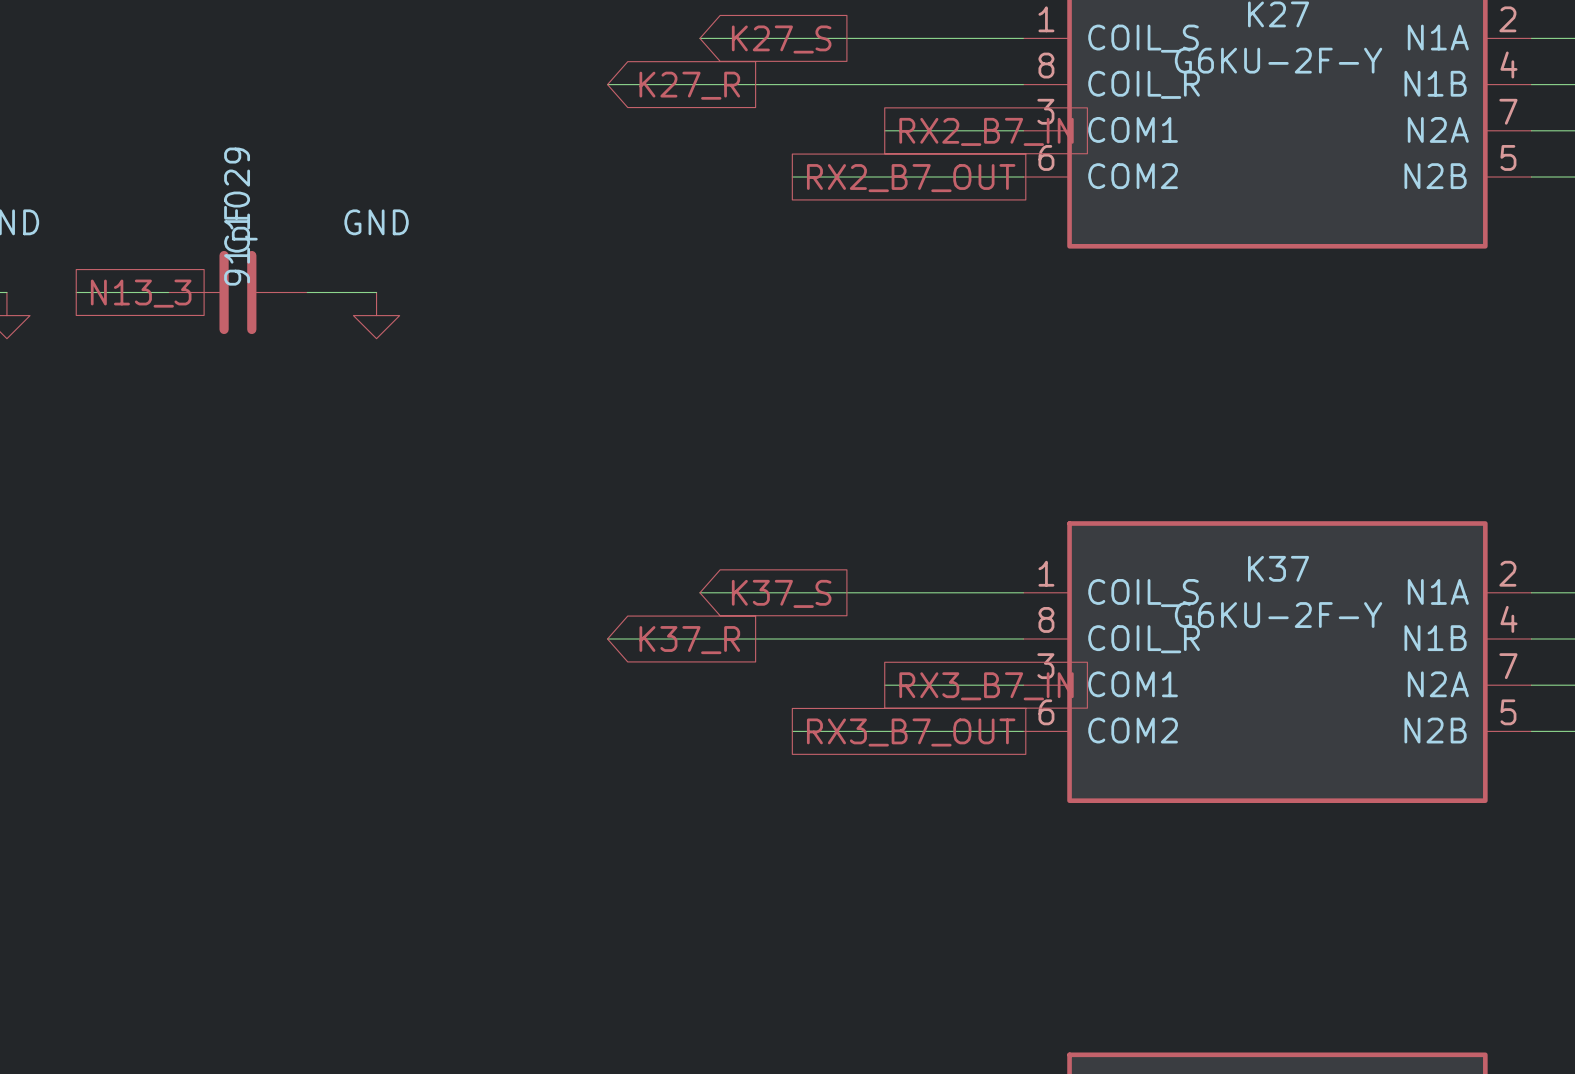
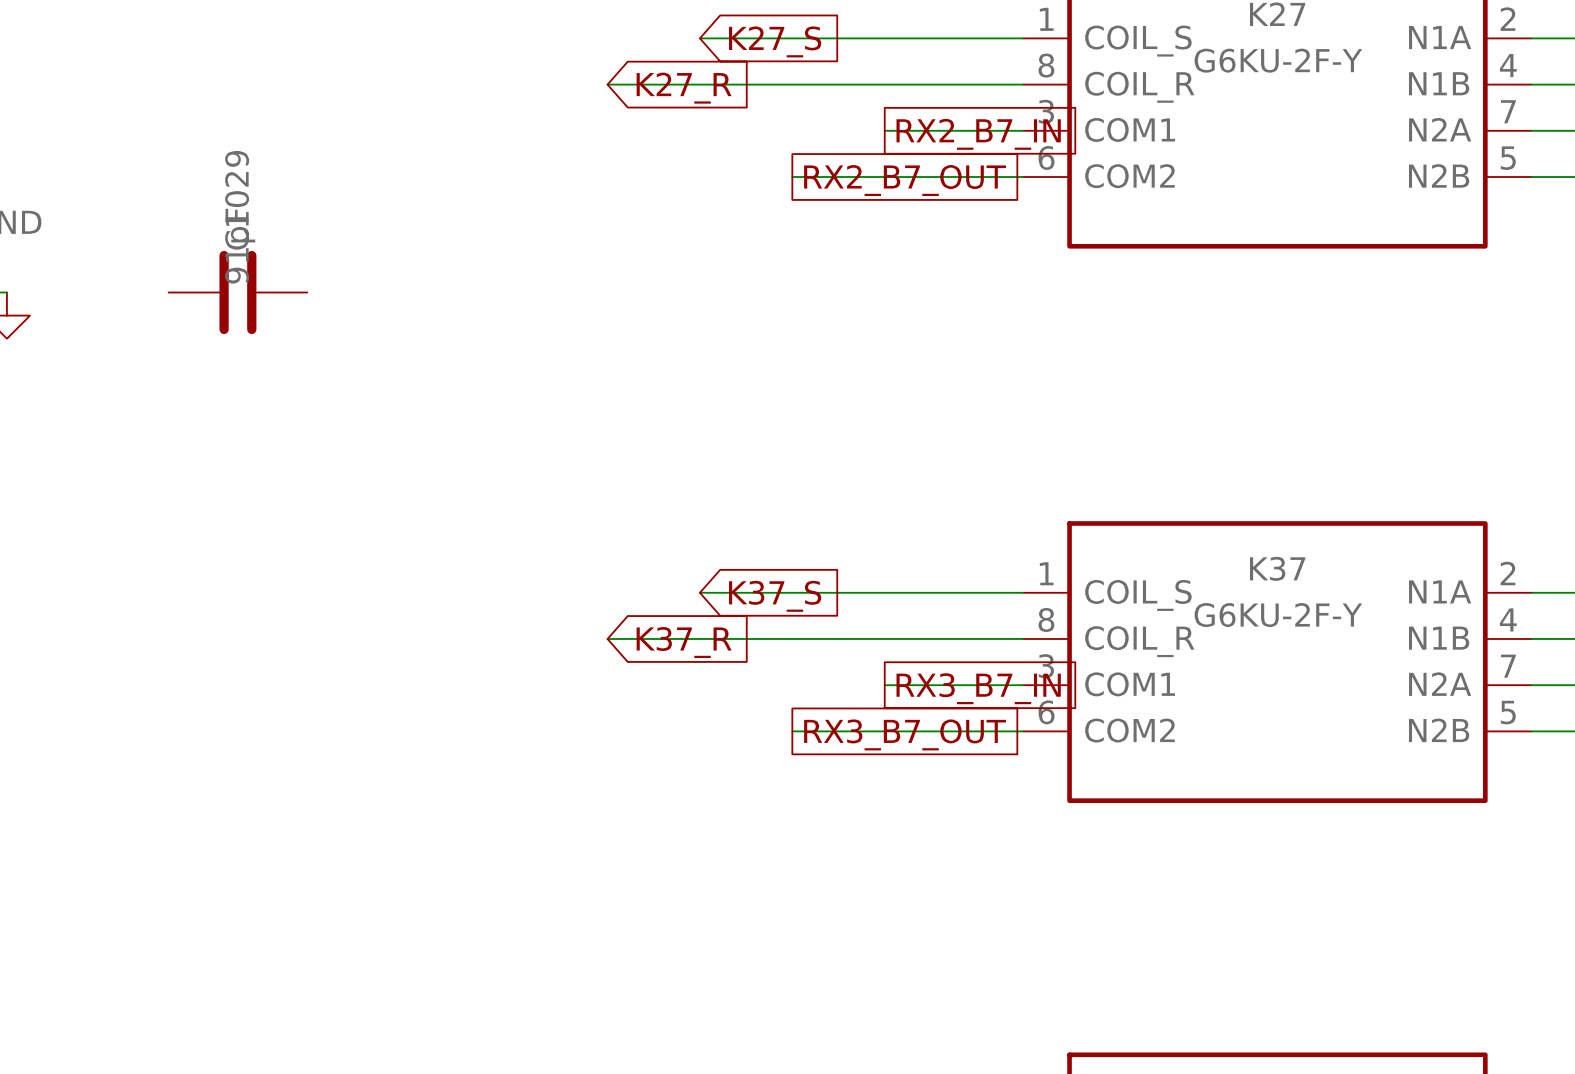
wire: (76, 292) (168, 292) -> none
wire: (307, 292) (376, 292) -> none
global label: N13_3 (141, 293) -> none
power symbol: GND (376, 315) -> none

